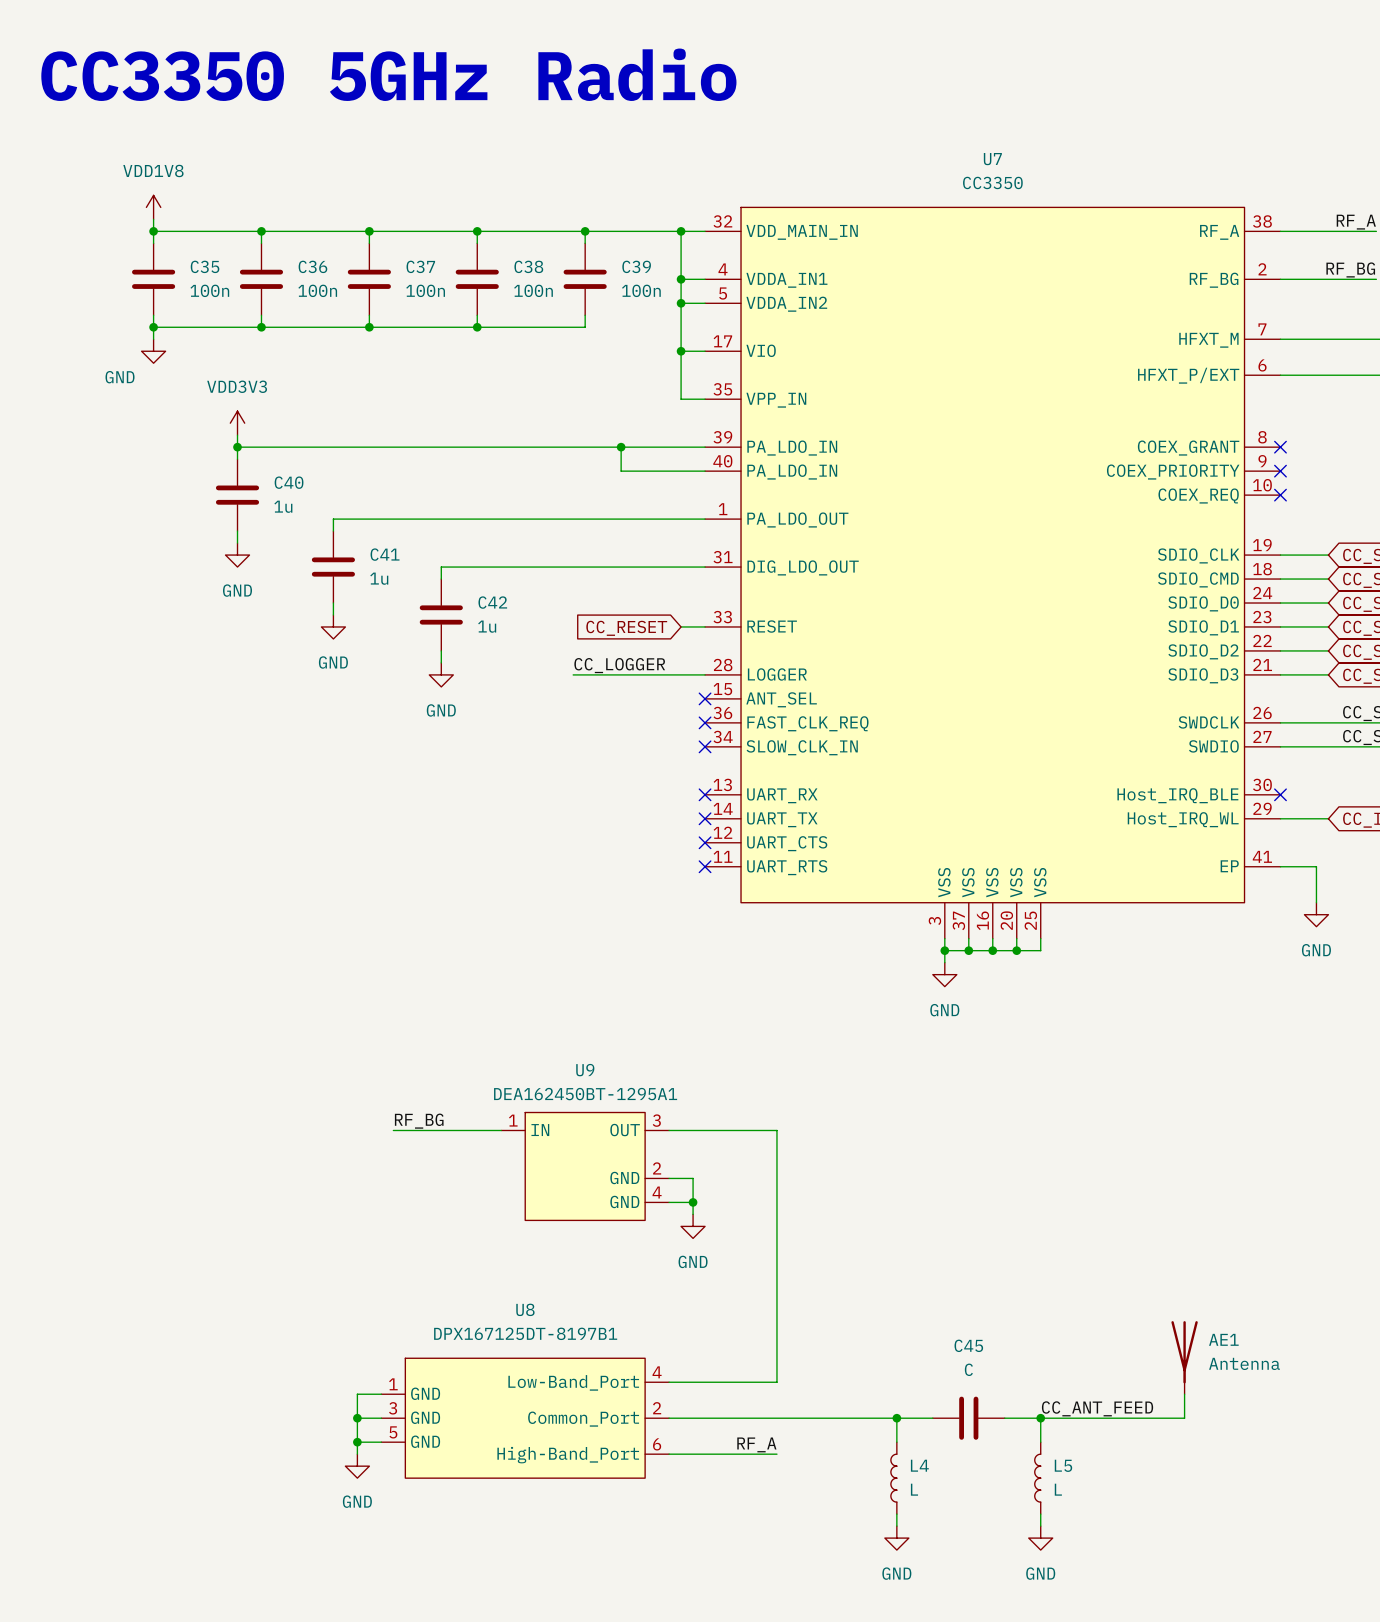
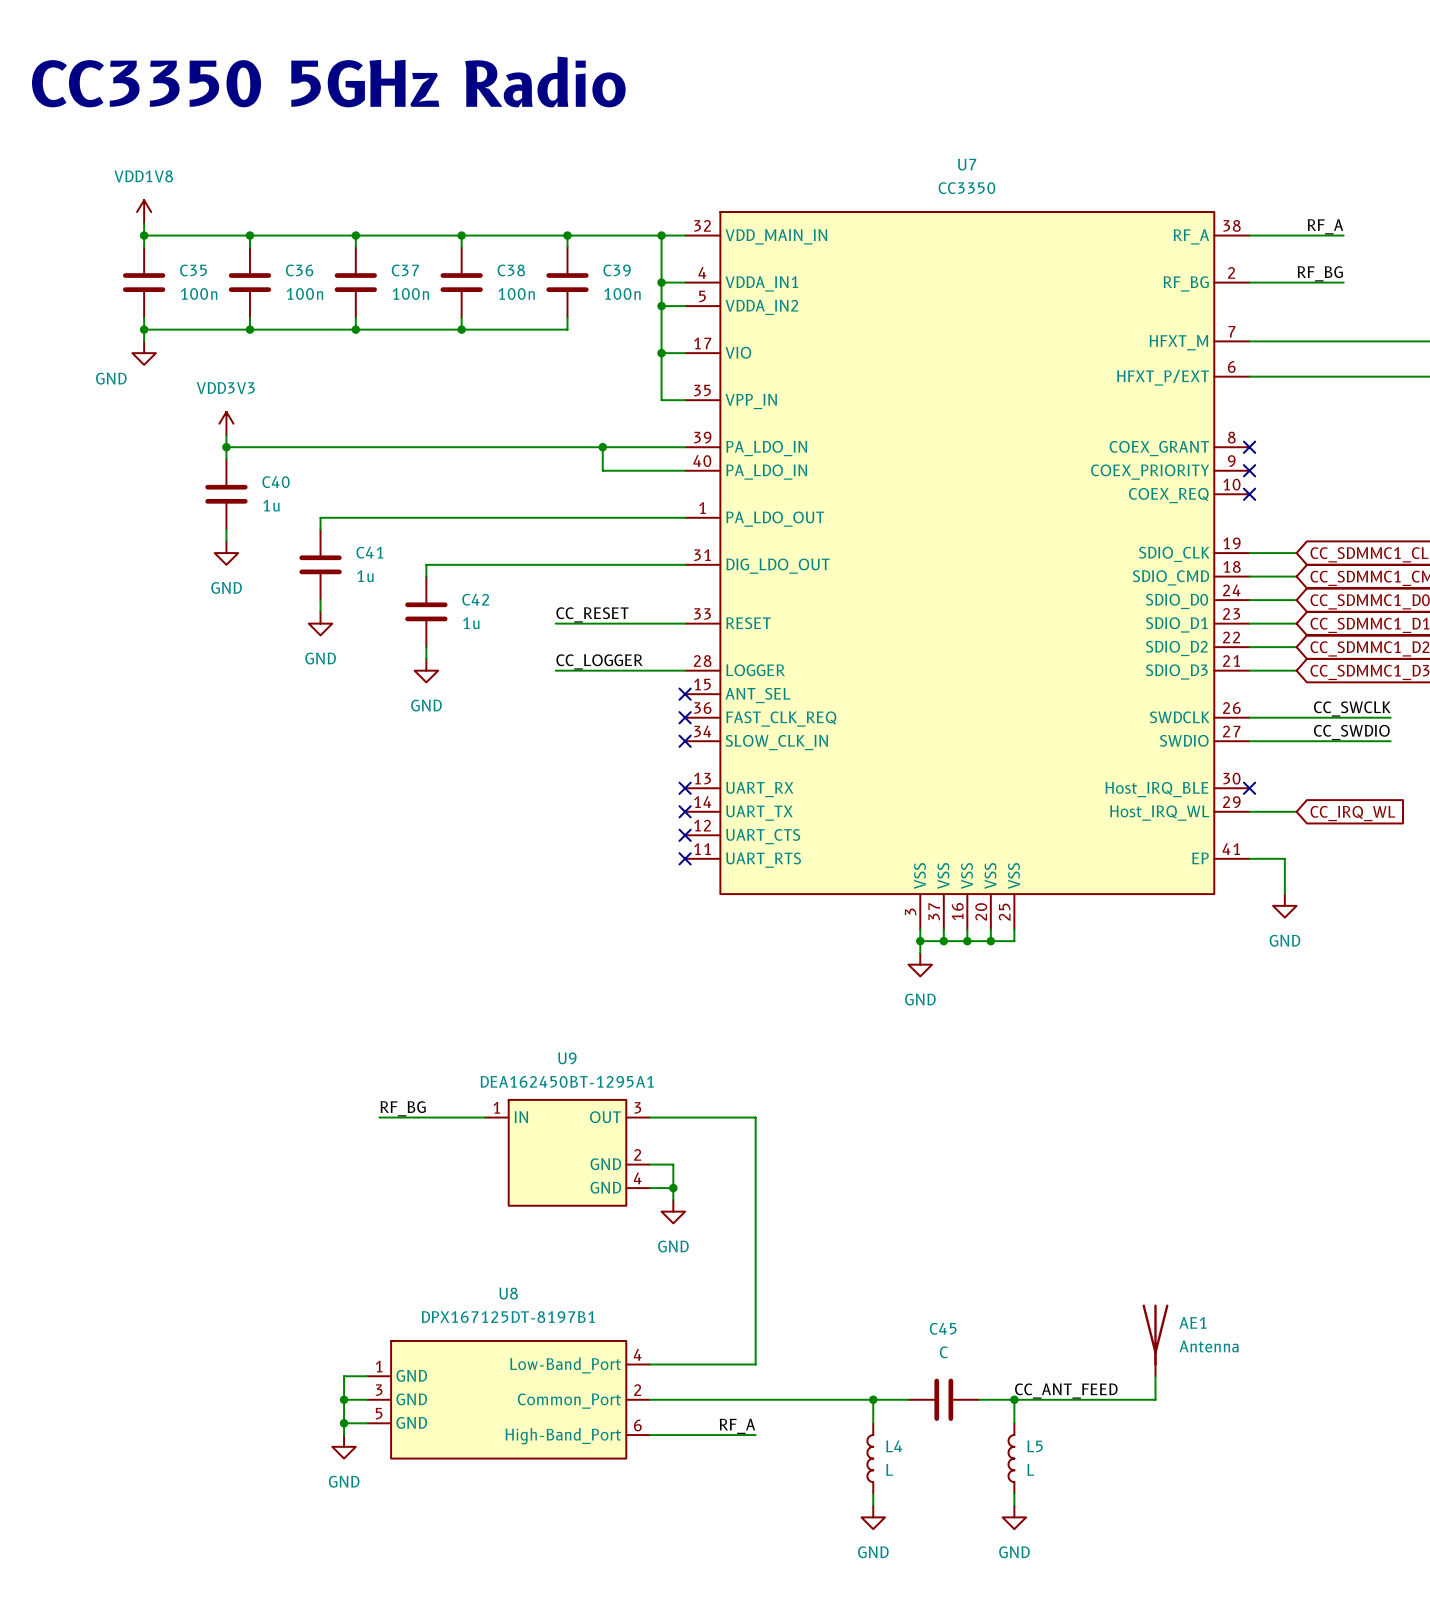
label: none -> CC_RESET (592, 614)
wire: none -> (555, 623) (661, 623)
global label: CC_RESET (626, 628) -> none

